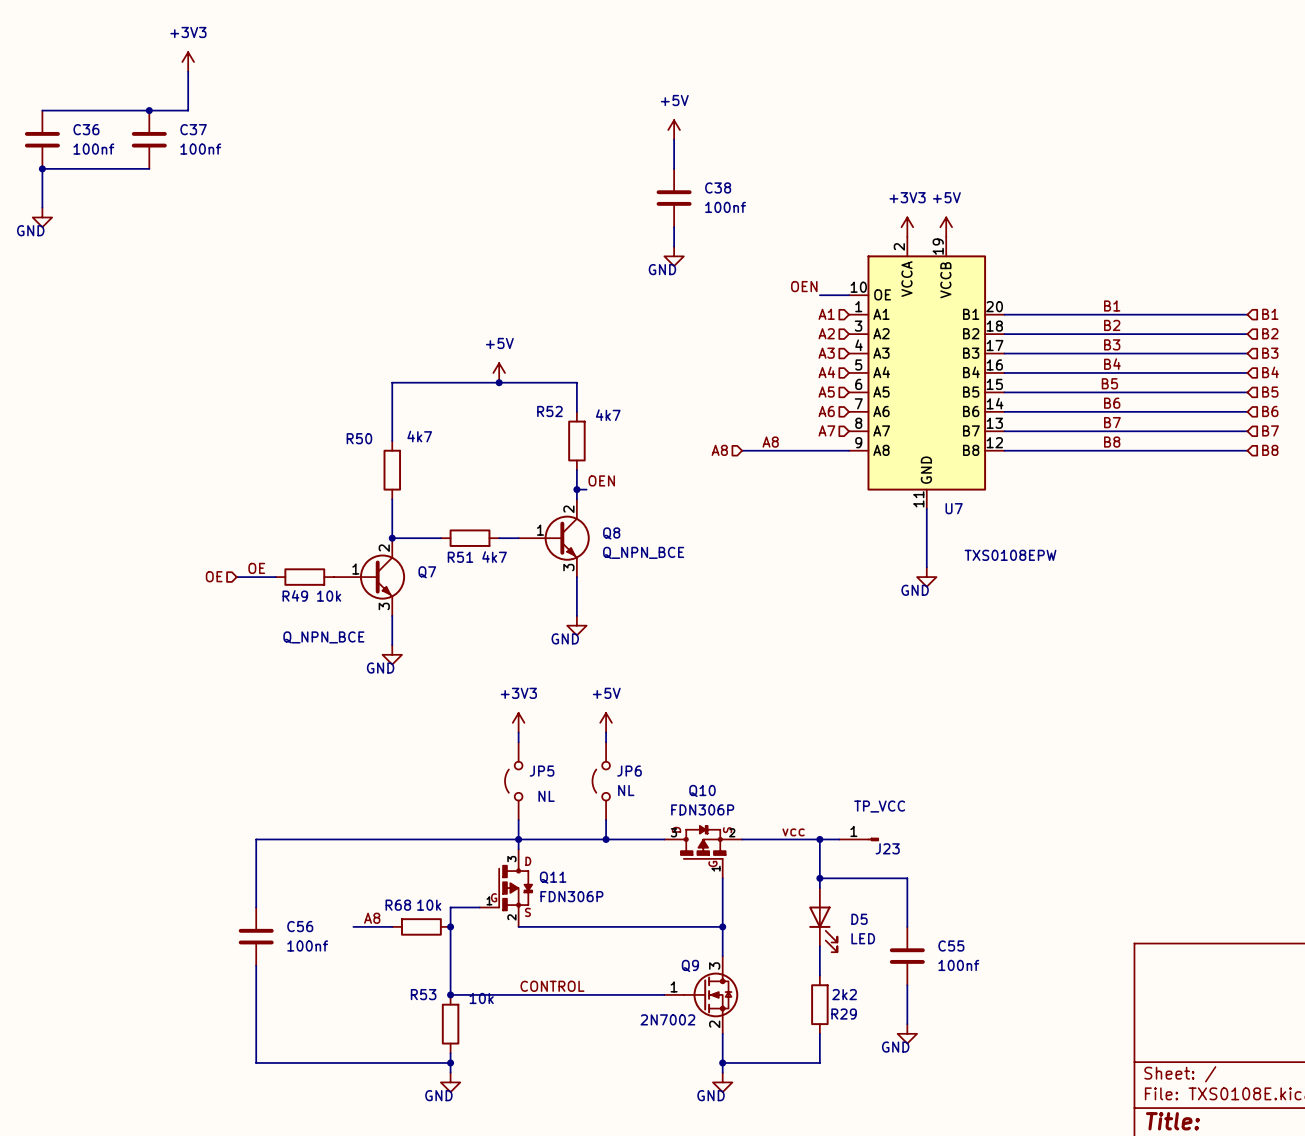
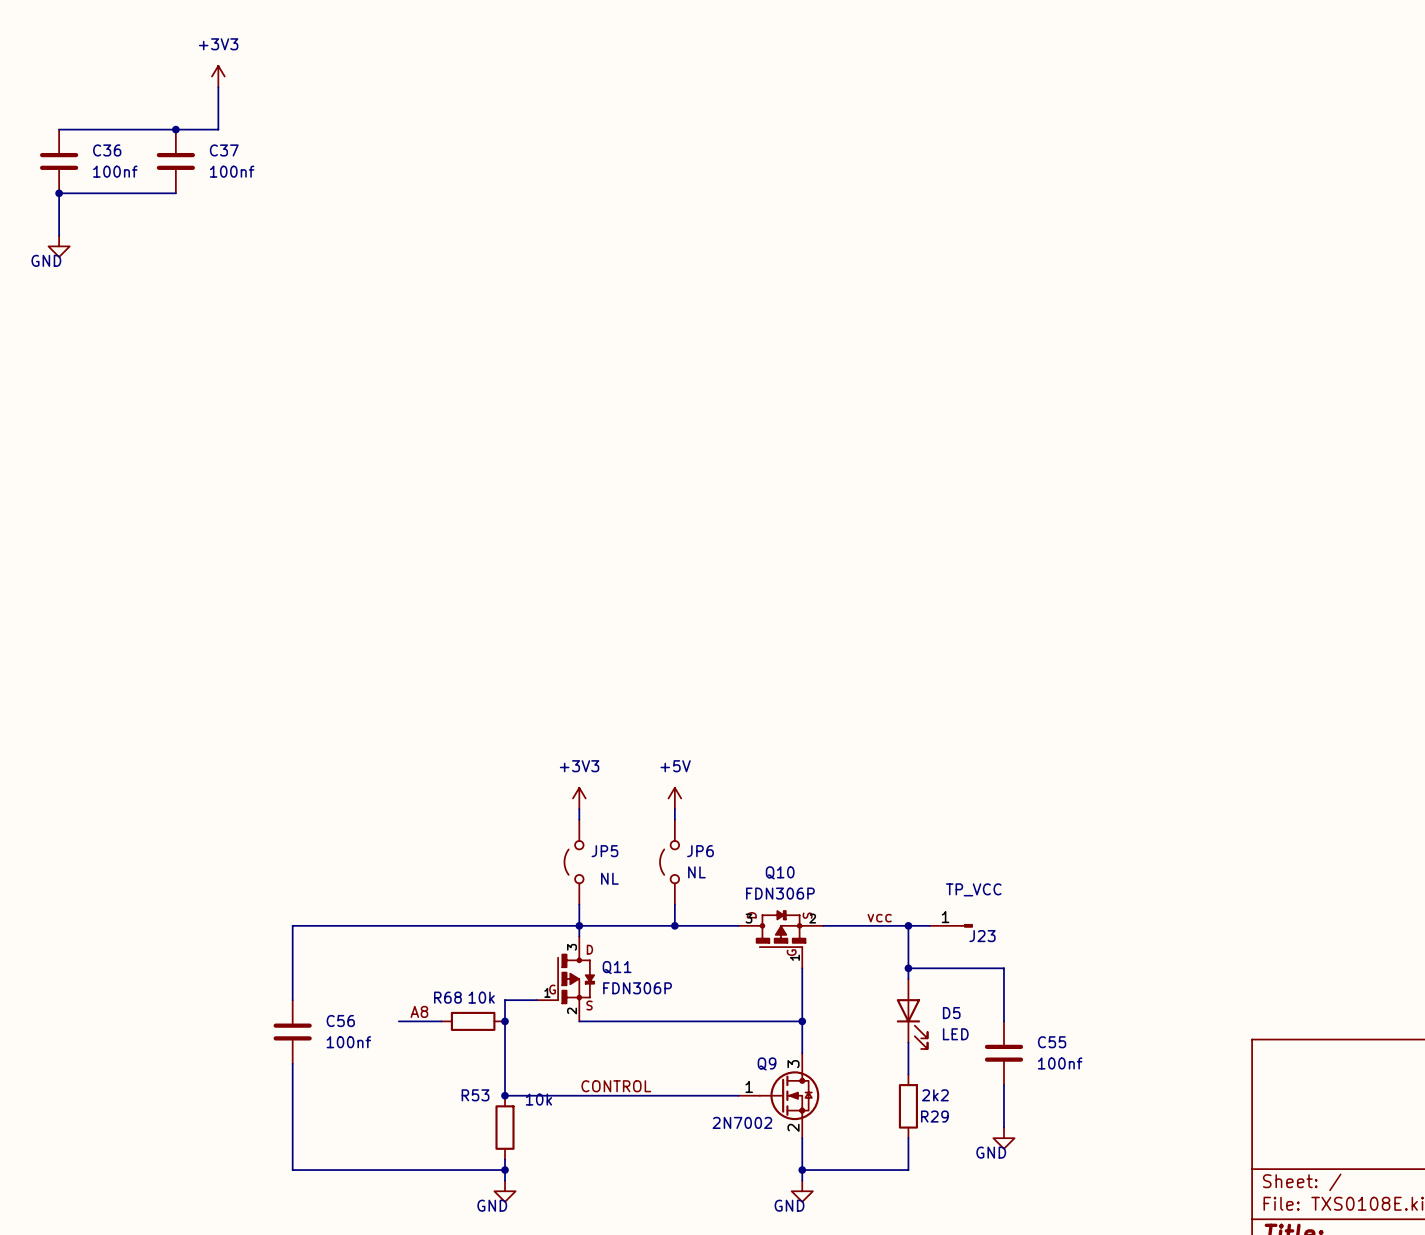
power symbol: +5V (674, 130) -> none
wire: (674, 139) (674, 168) -> none
C38: 100nf (674, 198) -> none
wire: (674, 227) (674, 246) -> none
power symbol: +3V3 (907, 227) -> none
power symbol: +5V (946, 227) -> none
power symbol: GND (674, 256) -> none
label: OEN (804, 286) -> none
wire: (819, 295) (849, 295) -> none
label: B1 (1112, 306) -> none
hierarchical label: A1 (826, 314) -> none
wire: (1004, 314) (1247, 314) -> none
hierarchical label: B1 (1270, 314) -> none
label: B2 (1112, 325) -> none
hierarchical label: A2 (826, 333) -> none
hierarchical label: B2 (1270, 333) -> none
wire: (1004, 334) (1247, 334) -> none
label: B3 (1112, 344) -> none
hierarchical label: A3 (826, 353) -> none
wire: (1004, 353) (1247, 353) -> none
hierarchical label: B3 (1270, 353) -> none
label: B4 (1112, 364) -> none
power symbol: +5V (499, 372) -> none
hierarchical label: A4 (826, 372) -> none
U7: TXS0108EPW (926, 372) -> none
wire: (1004, 372) (1247, 372) -> none
hierarchical label: B4 (1270, 372) -> none
junction: (499, 382) -> none
label: B5 (1109, 383) -> none
hierarchical label: A5 (826, 392) -> none
wire: (1004, 392) (1247, 392) -> none
hierarchical label: B5 (1270, 392) -> none
label: B6 (1112, 403) -> none
wire: (576, 411) (576, 382) (392, 382) (392, 441) -> none
hierarchical label: A6 (826, 411) -> none
wire: (1004, 411) (1247, 411) -> none
hierarchical label: B6 (1270, 411) -> none
label: B7 (1112, 422) -> none
hierarchical label: A7 (826, 430) -> none
hierarchical label: B7 (1270, 430) -> none
wire: (1004, 431) (1247, 431) -> none
R52: 4k7 (576, 441) -> none
label: A8 (770, 442) -> none
label: B8 (1112, 442) -> none
hierarchical label: A8 (719, 450) -> none
wire: (742, 450) (849, 450) -> none
wire: (1004, 450) (1247, 450) -> none
hierarchical label: B8 (1270, 450) -> none
R50: 4k7 (392, 470) -> none
wire: (576, 470) (576, 499) -> none
label: OEN (601, 480) -> none
wire: (576, 489) (586, 489) -> none
junction: (576, 489) -> none
wire: (392, 499) (392, 538) (440, 538) -> none
wire: (926, 509) (926, 567) -> none
junction: (392, 538) -> none
R51: 4k7 (470, 538) -> none
wire: (499, 538) (518, 538) -> none
Q8: Q_NPN_BCE (554, 538) -> none
label: OE (256, 568) -> none
hierarchical label: OE (214, 576) -> none
wire: (236, 577) (275, 577) -> none
R49: 10k (304, 577) -> none
Q7: Q_NPN_BCE (369, 577) -> none
wire: (576, 577) (576, 615) -> none
power symbol: GND (926, 577) -> none
wire: (392, 615) (392, 645) -> none
power symbol: GND (576, 625) -> none
power symbol: GND (392, 654) -> none

